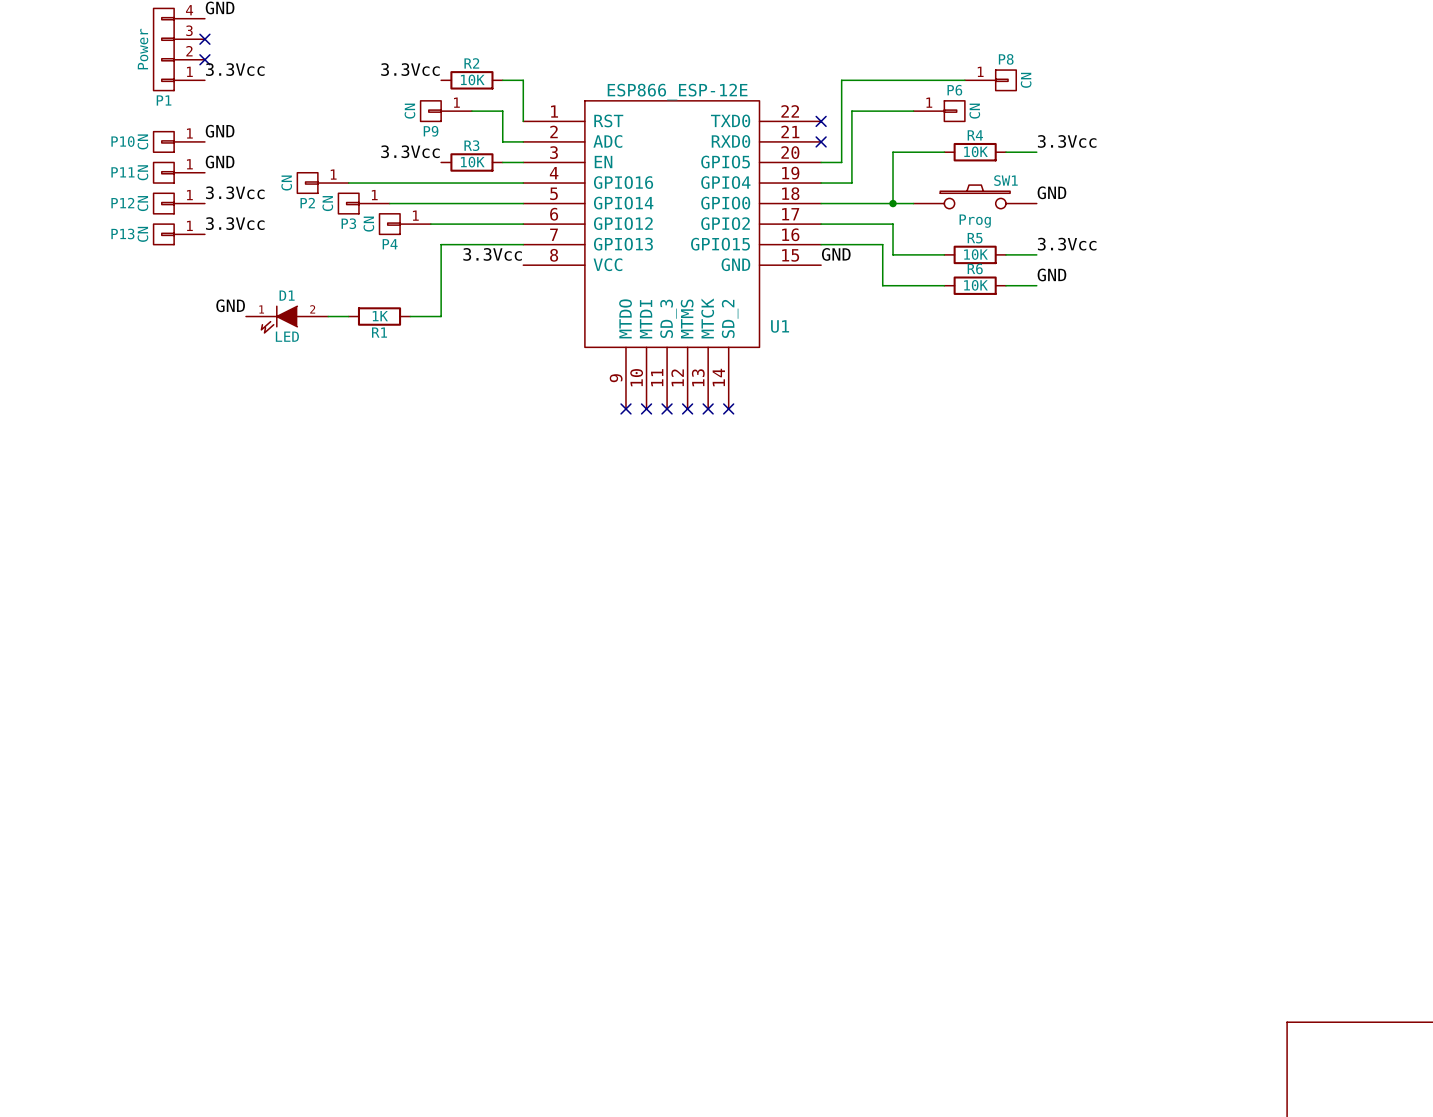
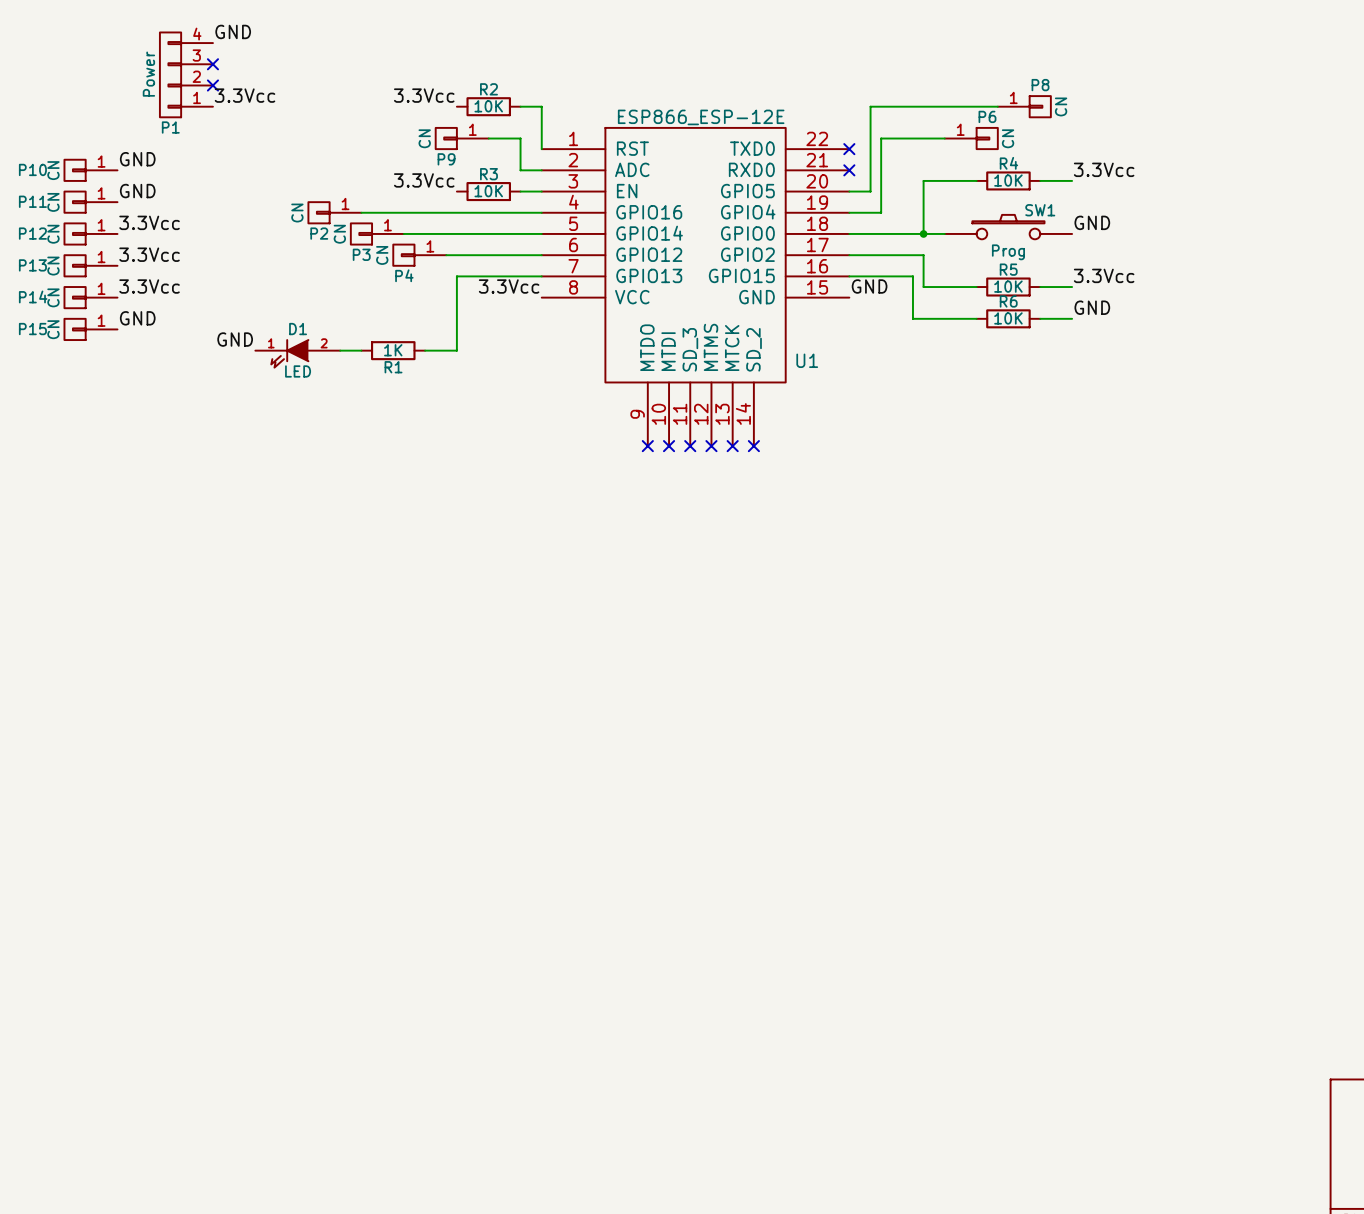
label: none -> GND (137, 159)
label: GND (220, 131) -> none
P10 position: (179, 141) -> (90, 170)
label: none -> GND (137, 191)
label: GND (220, 162) -> none
P11 position: (179, 172) -> (90, 202)
label: none -> 3.3Vcc (149, 222)
label: 3.3Vcc (235, 192) -> none
P12 position: (179, 203) -> (90, 233)
label: none -> 3.3Vcc (149, 254)
label: 3.3Vcc (235, 223) -> none
P13 position: (179, 234) -> (90, 265)
label: none -> 3.3Vcc (149, 286)
P14: none -> CN (90, 297)
label: none -> GND (137, 318)
P15: none -> CN (90, 329)

